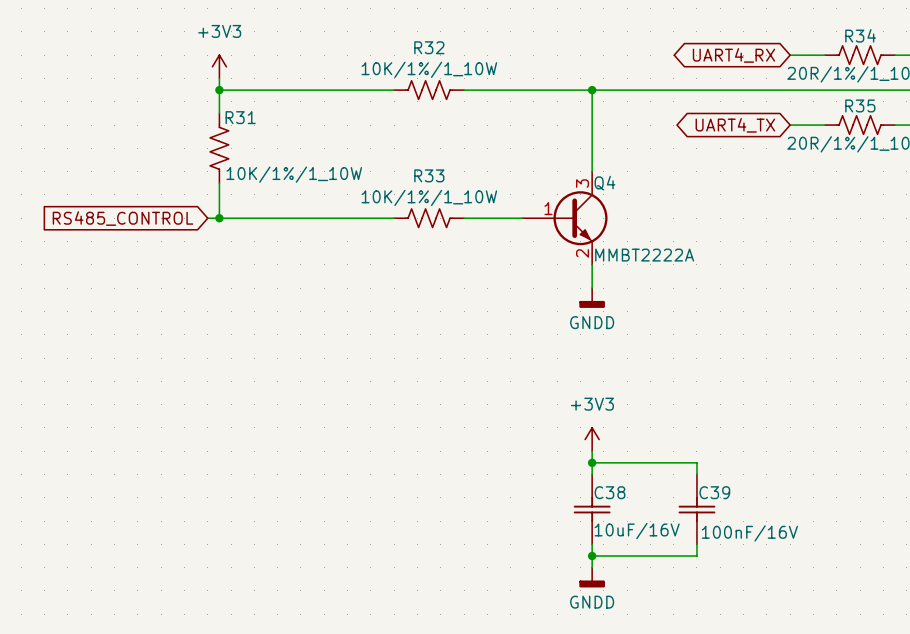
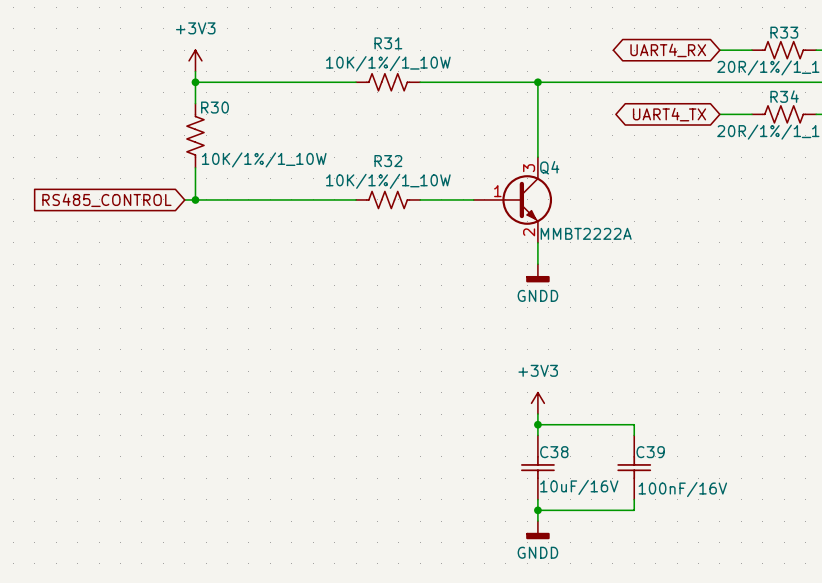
R34 name: R34 (860, 35) -> R33 (784, 32)
R32 name: R32 (429, 47) -> R31 (388, 43)
R35 name: R35 (860, 105) -> R34 (784, 96)
R31 name: R31 (240, 117) -> R30 (214, 107)
R33 name: R33 (429, 175) -> R32 (388, 161)

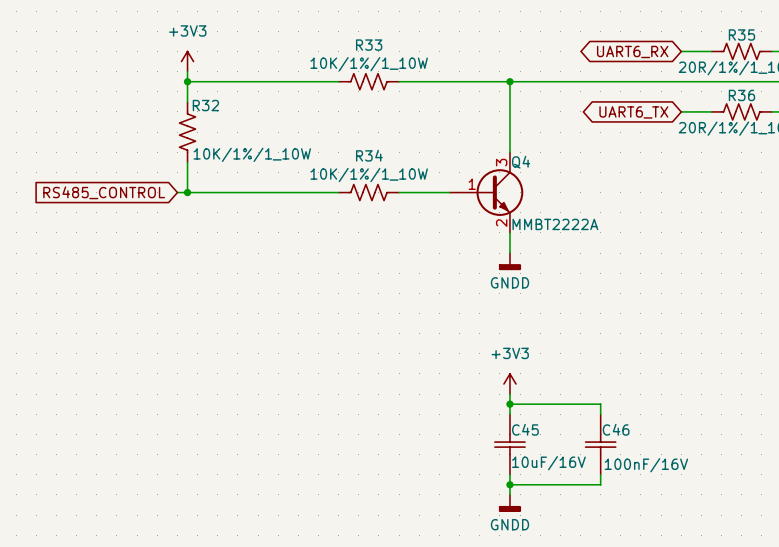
R33 name: R33 (784, 32) -> R35 (741, 34)
R31 name: R31 (388, 43) -> R33 (369, 45)
global label: UART4_RX (668, 50) -> UART6_RX (632, 51)
R34 name: R34 (784, 96) -> R36 (741, 95)
R30 name: R30 (214, 107) -> R32 (205, 105)
global label: UART4_TX (669, 114) -> UART6_TX (633, 112)
R32 name: R32 (388, 161) -> R34 (369, 155)
C38 name: C38 (554, 452) -> C45 (525, 429)
C39 name: C39 (650, 452) -> C46 (616, 429)

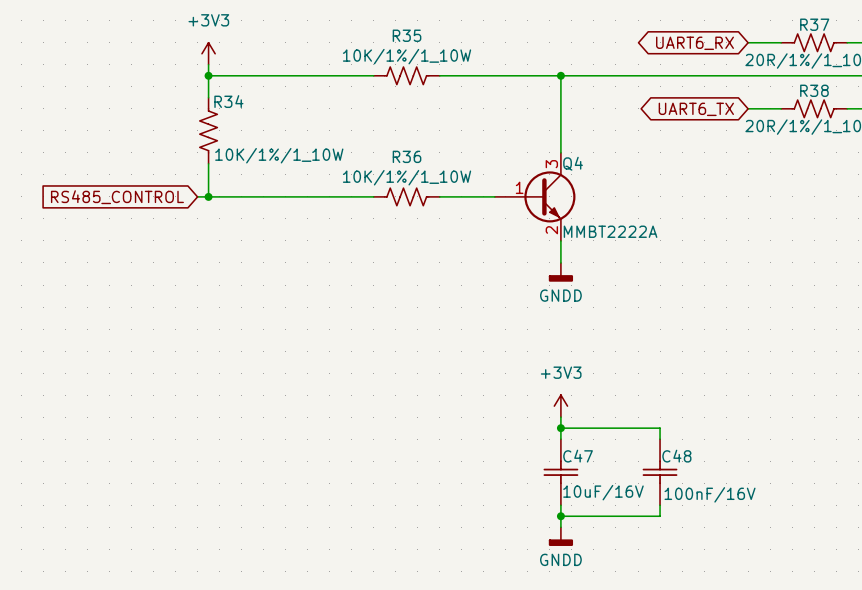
R35 name: R35 (741, 34) -> R37 (814, 24)
R33 name: R33 (369, 45) -> R35 (407, 35)
R36 name: R36 (741, 95) -> R38 (814, 90)
R32 name: R32 (205, 105) -> R34 (228, 101)
R34 name: R34 (369, 155) -> R36 (407, 156)
C45 name: C45 (525, 429) -> C47 (578, 456)
C46 name: C46 (616, 429) -> C48 (676, 456)

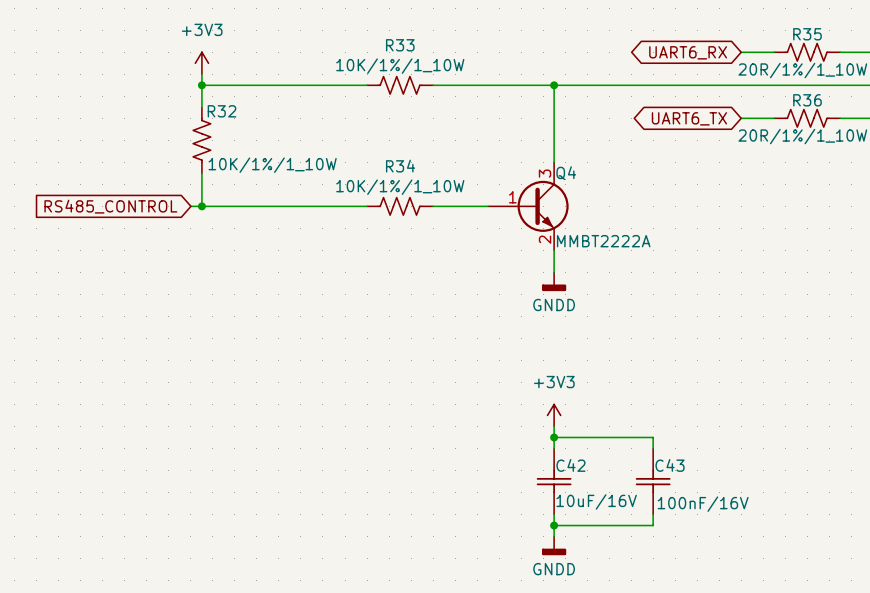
R37 name: R37 (814, 24) -> R35 (807, 34)
R35 name: R35 (407, 35) -> R33 (400, 45)
R38 name: R38 (814, 90) -> R36 (807, 100)
R34 name: R34 (228, 101) -> R32 (222, 111)
R36 name: R36 (407, 156) -> R34 (400, 166)
C47 name: C47 (578, 456) -> C42 (570, 465)
C48 name: C48 (676, 456) -> C43 (670, 465)

